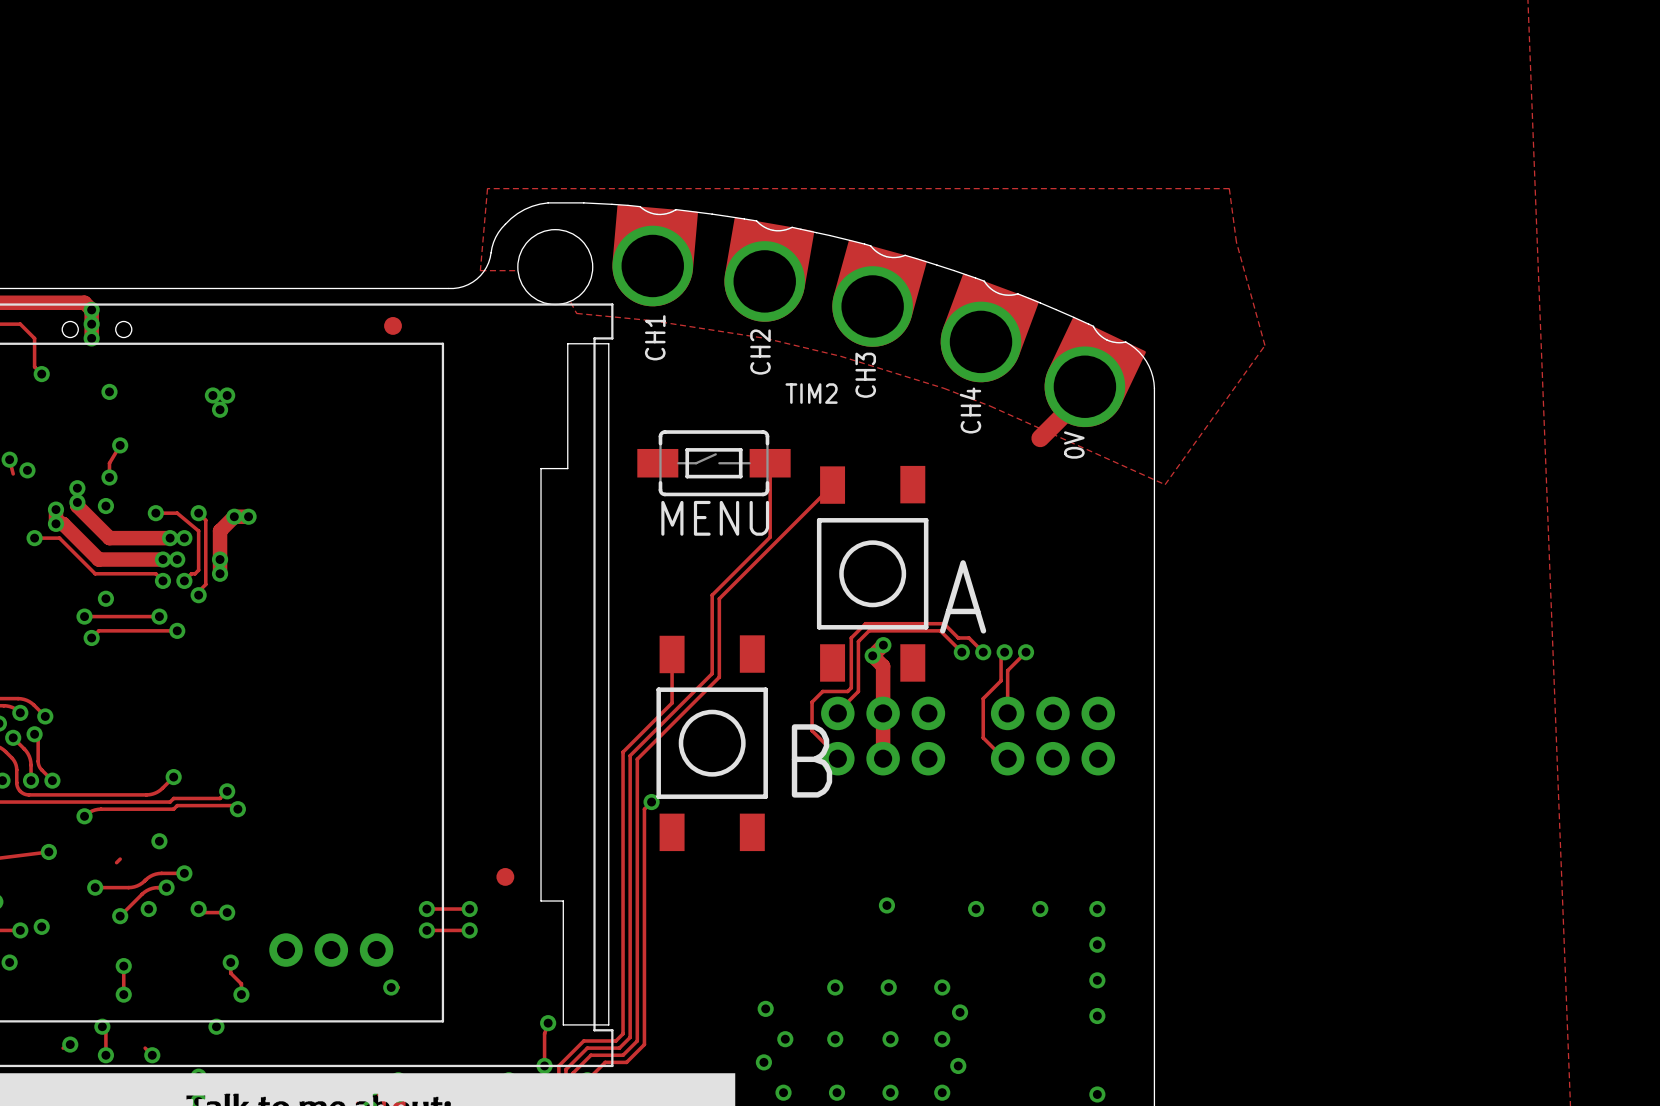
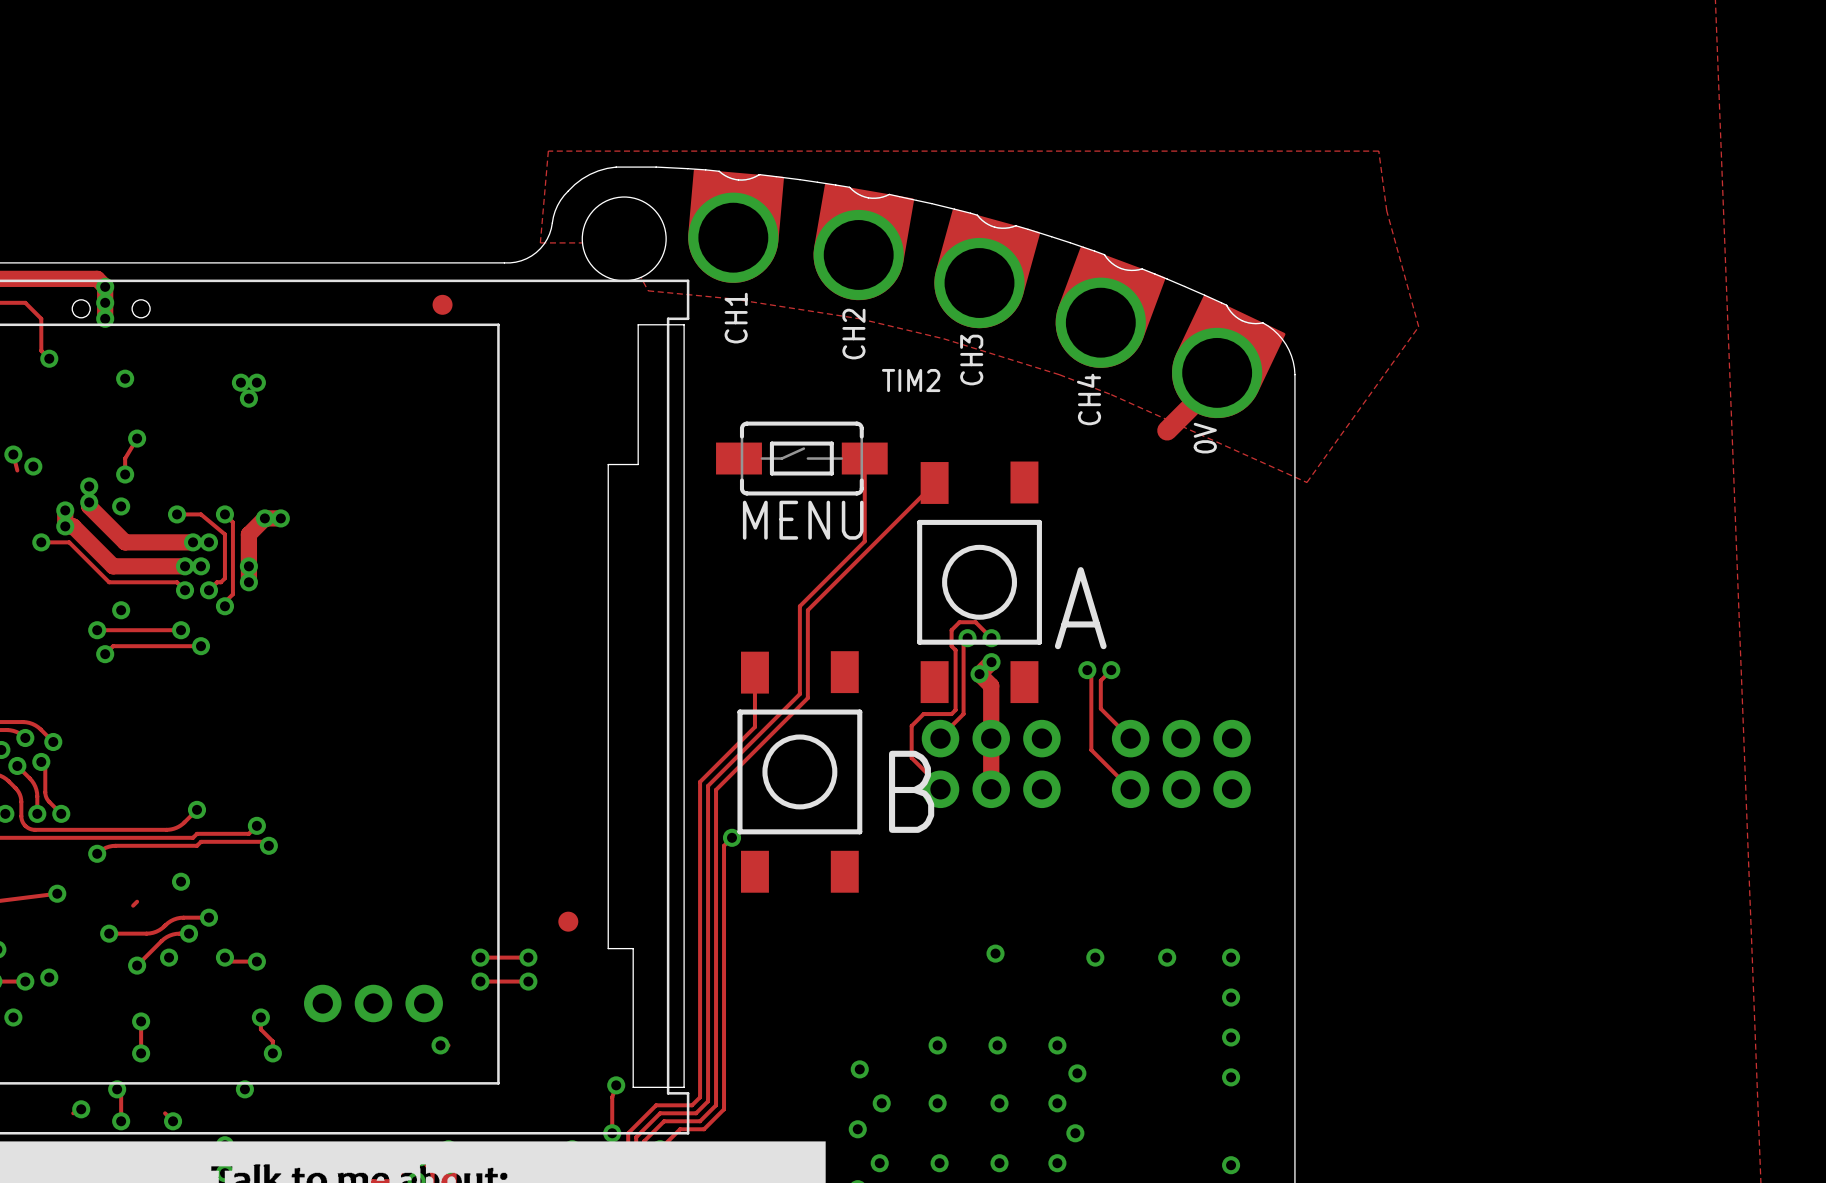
via: none -> (967, 638)
via: none -> (991, 638)
track: (851, 637) (865, 623) (944, 623) (958, 637) (968, 637) (983, 652) -> (955, 654) (955, 650) (951, 646) (951, 630) (959, 622) (975, 622) (991, 638)
track: (858, 641) (869, 630) (940, 630) (961, 652) -> (963, 658) (963, 642) (967, 638)
via: (961, 652) -> none
via: none -> (1087, 670)
via: (983, 652) -> none
via: none -> (1111, 670)
track: (1004, 652) (1001, 655) (1001, 680) (983, 698) (983, 737) (1004, 758) (1007, 758) -> (1087, 670) (1091, 674) (1091, 749) (1130, 789)
via: (1004, 652) -> none
track: (1026, 652) (1007, 670) (1007, 713) -> (1111, 670) (1100, 680) (1100, 708) (1130, 738)
via: (1026, 652) -> none

